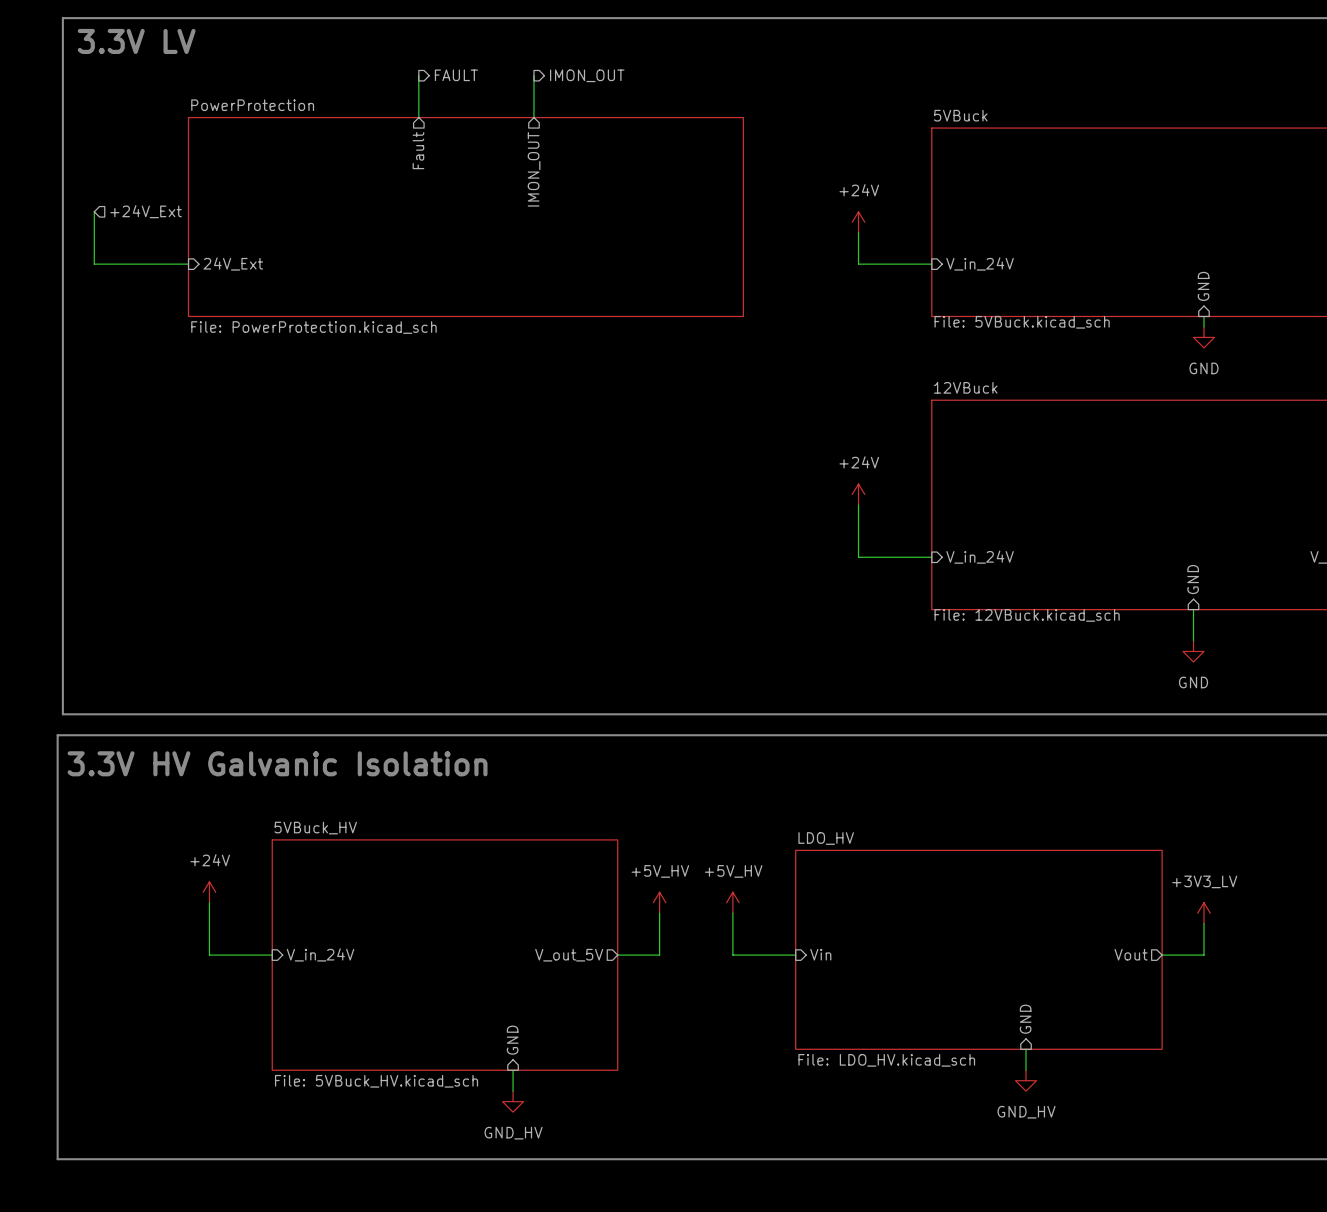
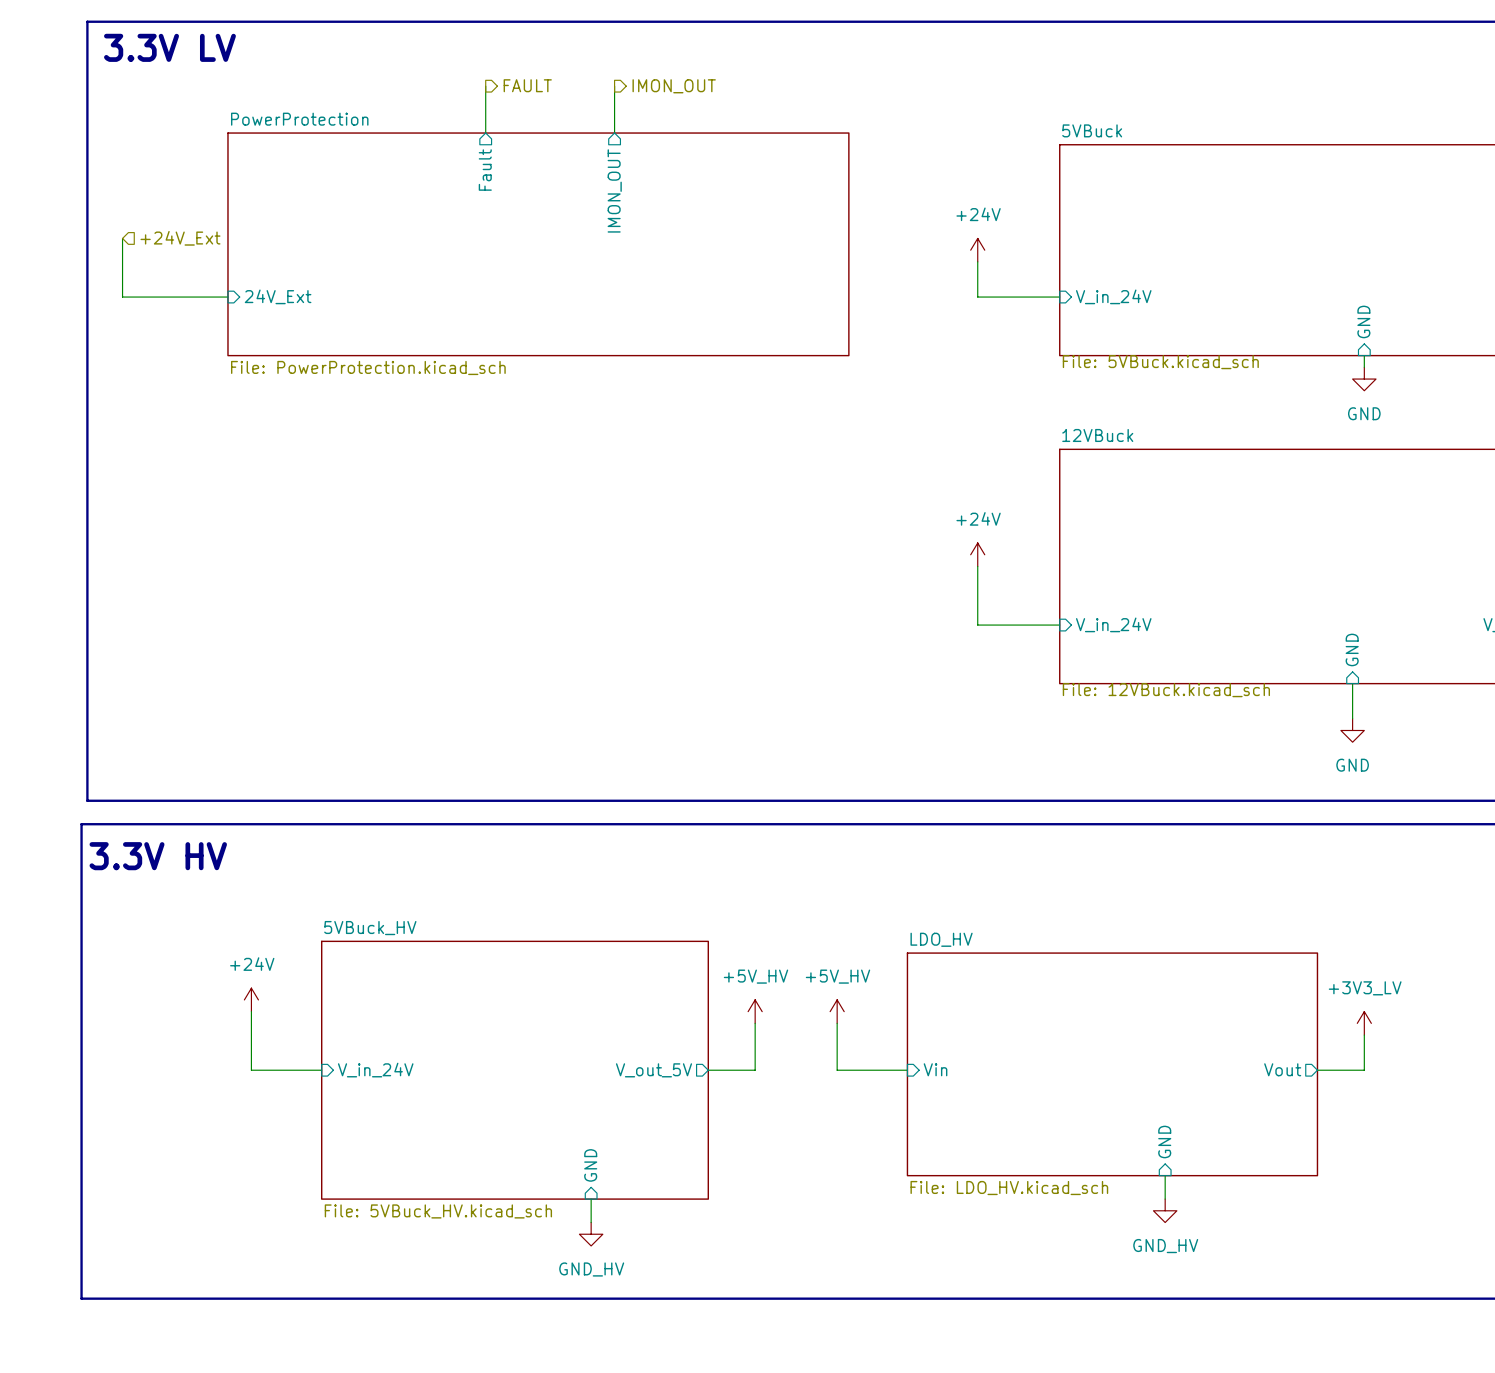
text: none -> 3.3V HV (158, 856)
text: 3.3V HV Galvanic Isolation (277, 763) -> none

